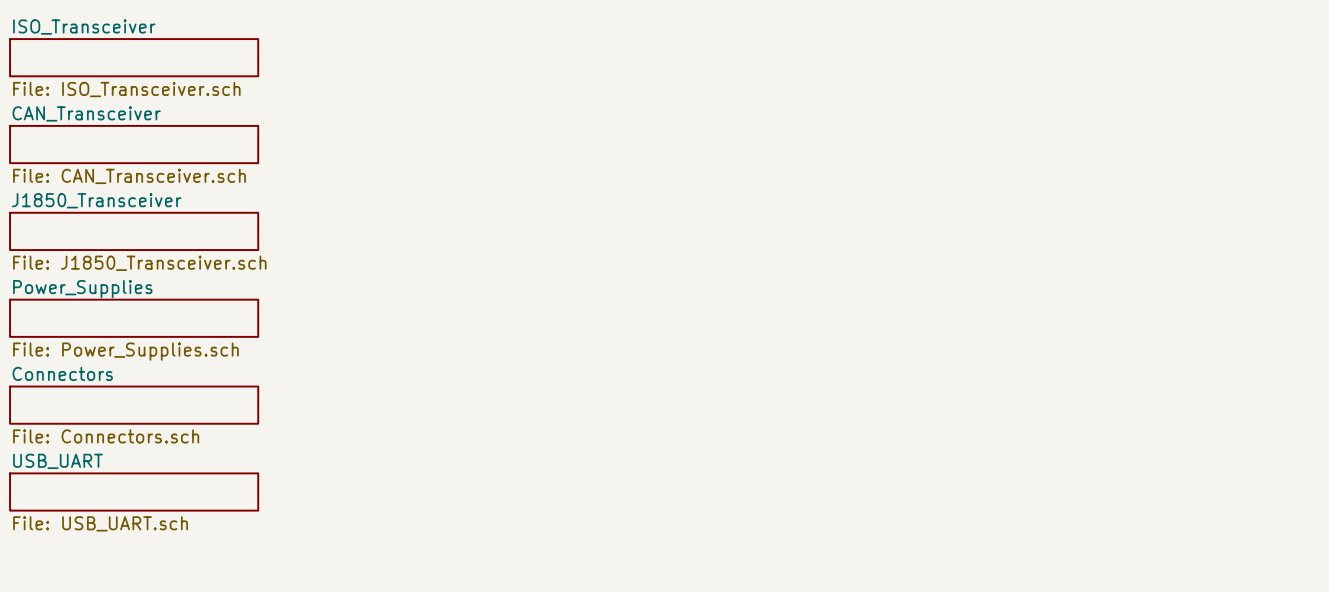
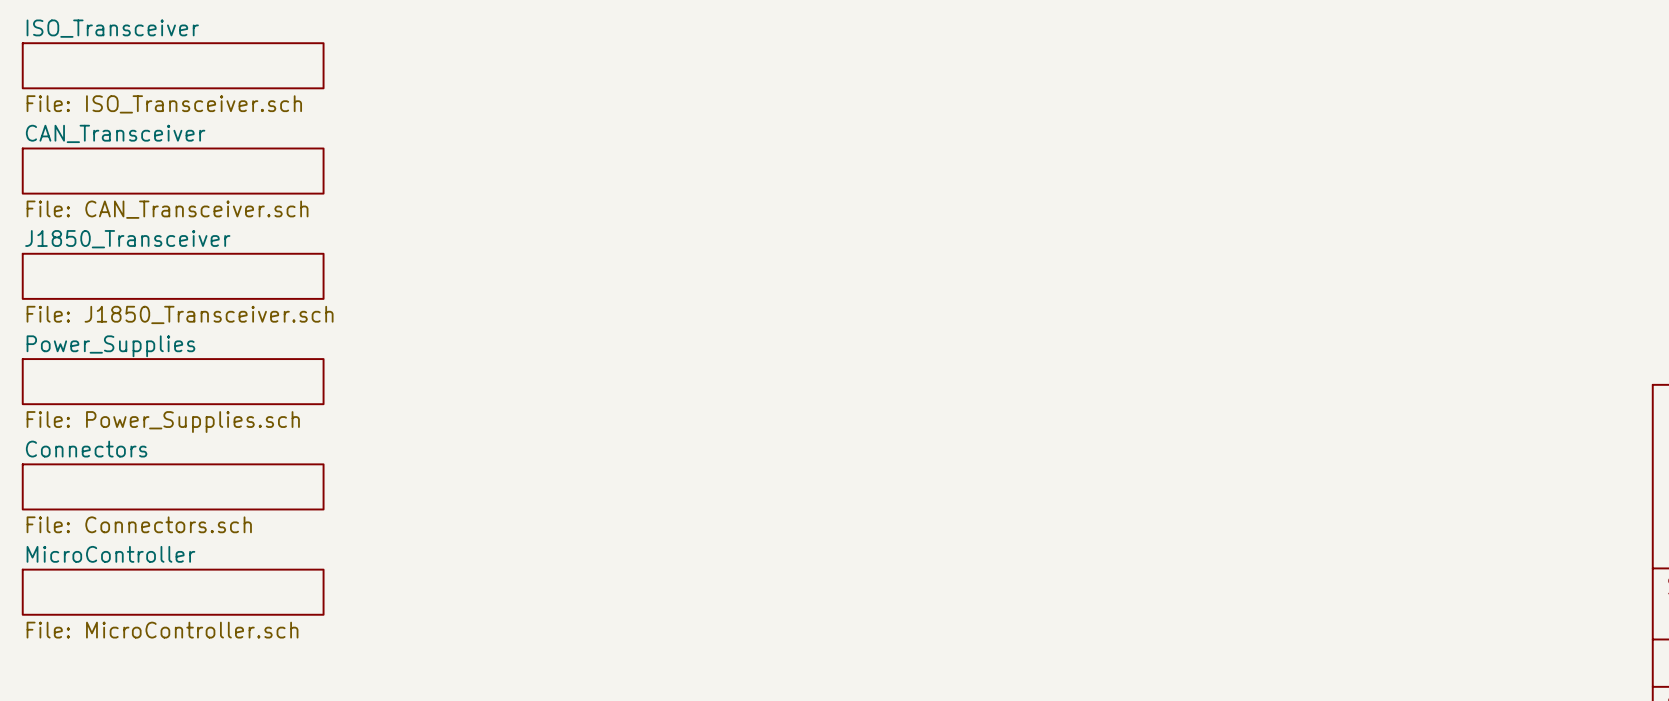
sheet USB_UART name: USB_UART (58, 461) -> MicroController (110, 554)
sheet USB_UART value: File: USB_UART.sch (100, 523) -> File: MicroController.sch (162, 630)

